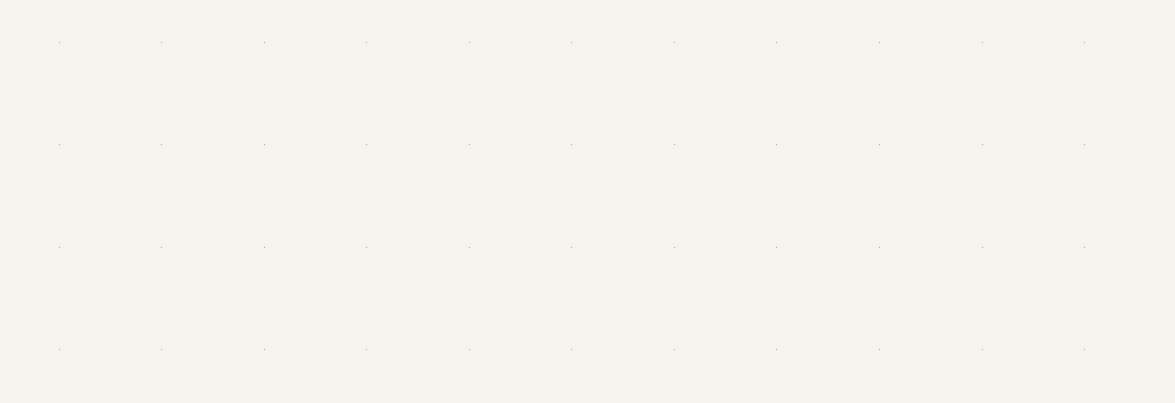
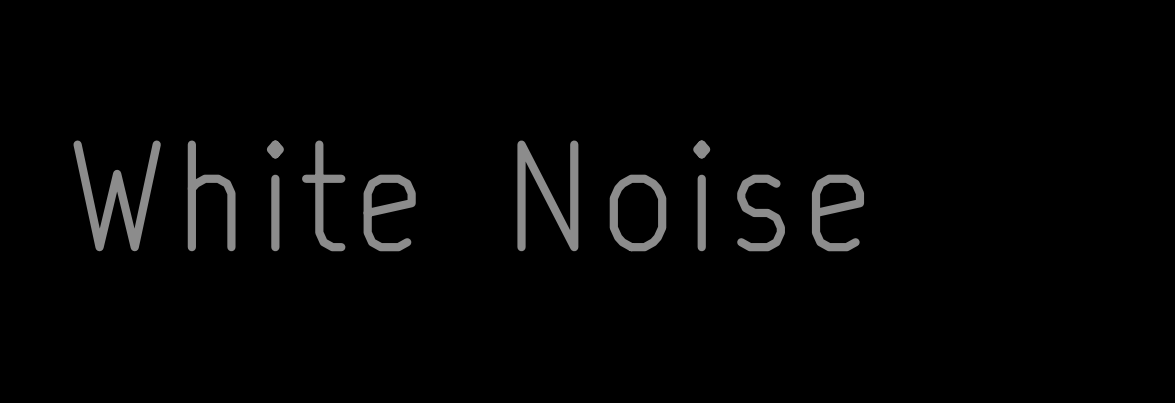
text: none -> White Noise (468, 195)

